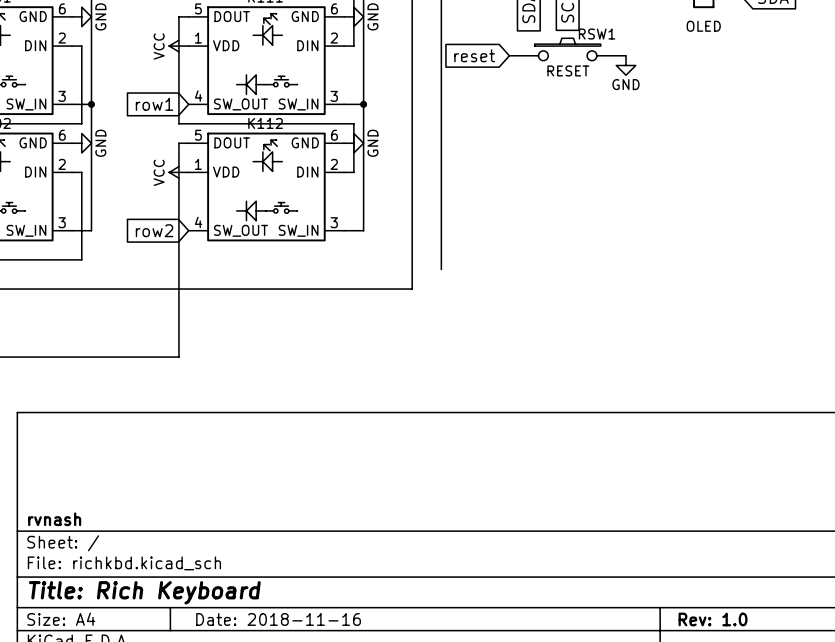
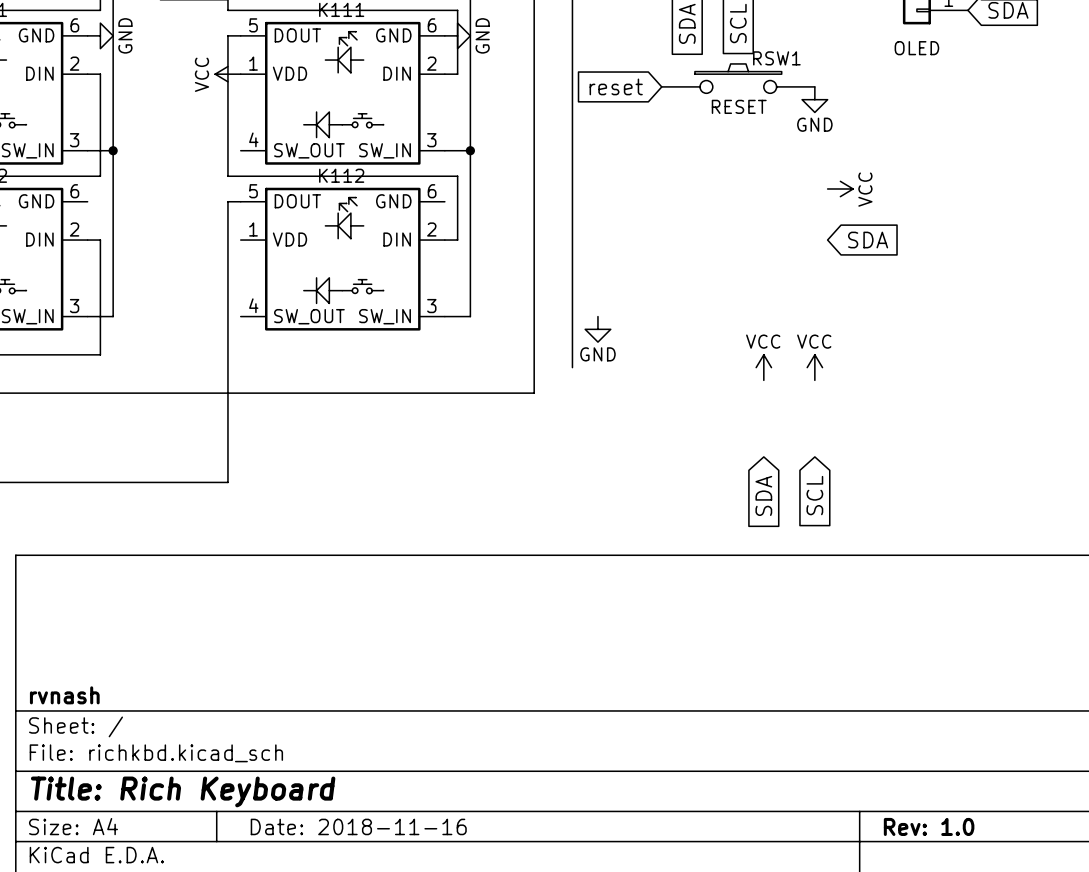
global label: row1 (154, 104) -> none
power symbol: none -> VCC (840, 188)
power symbol: GND (81, 143) -> none
power symbol rotation: 0° (353, 143) -> 90° clockwise (597, 329)
power symbol position: GND (353, 143) -> GND (597, 329)
power symbol: VCC (178, 172) -> none
global label: none -> SDA (868, 240)
global label: row2 (154, 230) -> none
power symbol: none -> VCC (763, 367)
power symbol: none -> VCC (814, 367)
global label: none -> SDA (763, 495)
global label: none -> SCL (814, 495)

